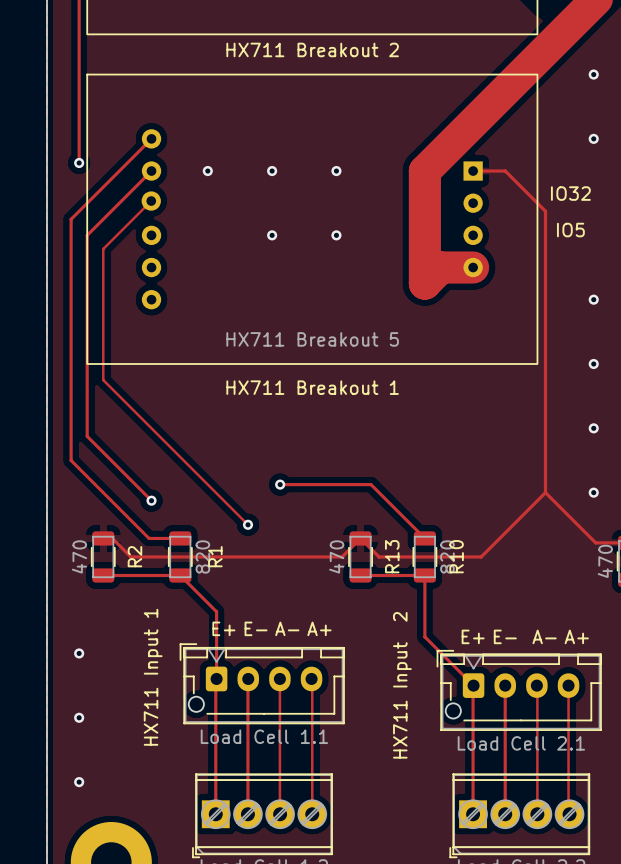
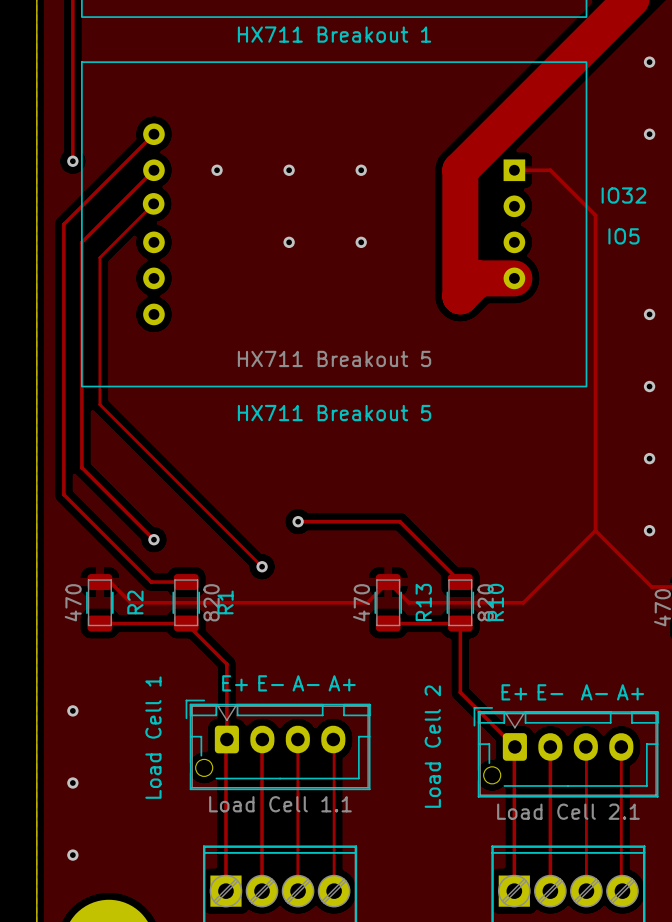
HX711 Breakout 2 name: HX711 Breakout 2 (312, 49) -> HX711 Breakout 1 (334, 34)
HX711 Breakout 1 name: HX711 Breakout 1 (312, 387) -> HX711 Breakout 5 (334, 413)
HX711 Input 1 name: HX711 Input 1 (153, 677) -> Load Cell 1 (153, 737)
HX711 Input 2 name: HX711 Input 2 (402, 685) -> Load Cell 2 (432, 746)

